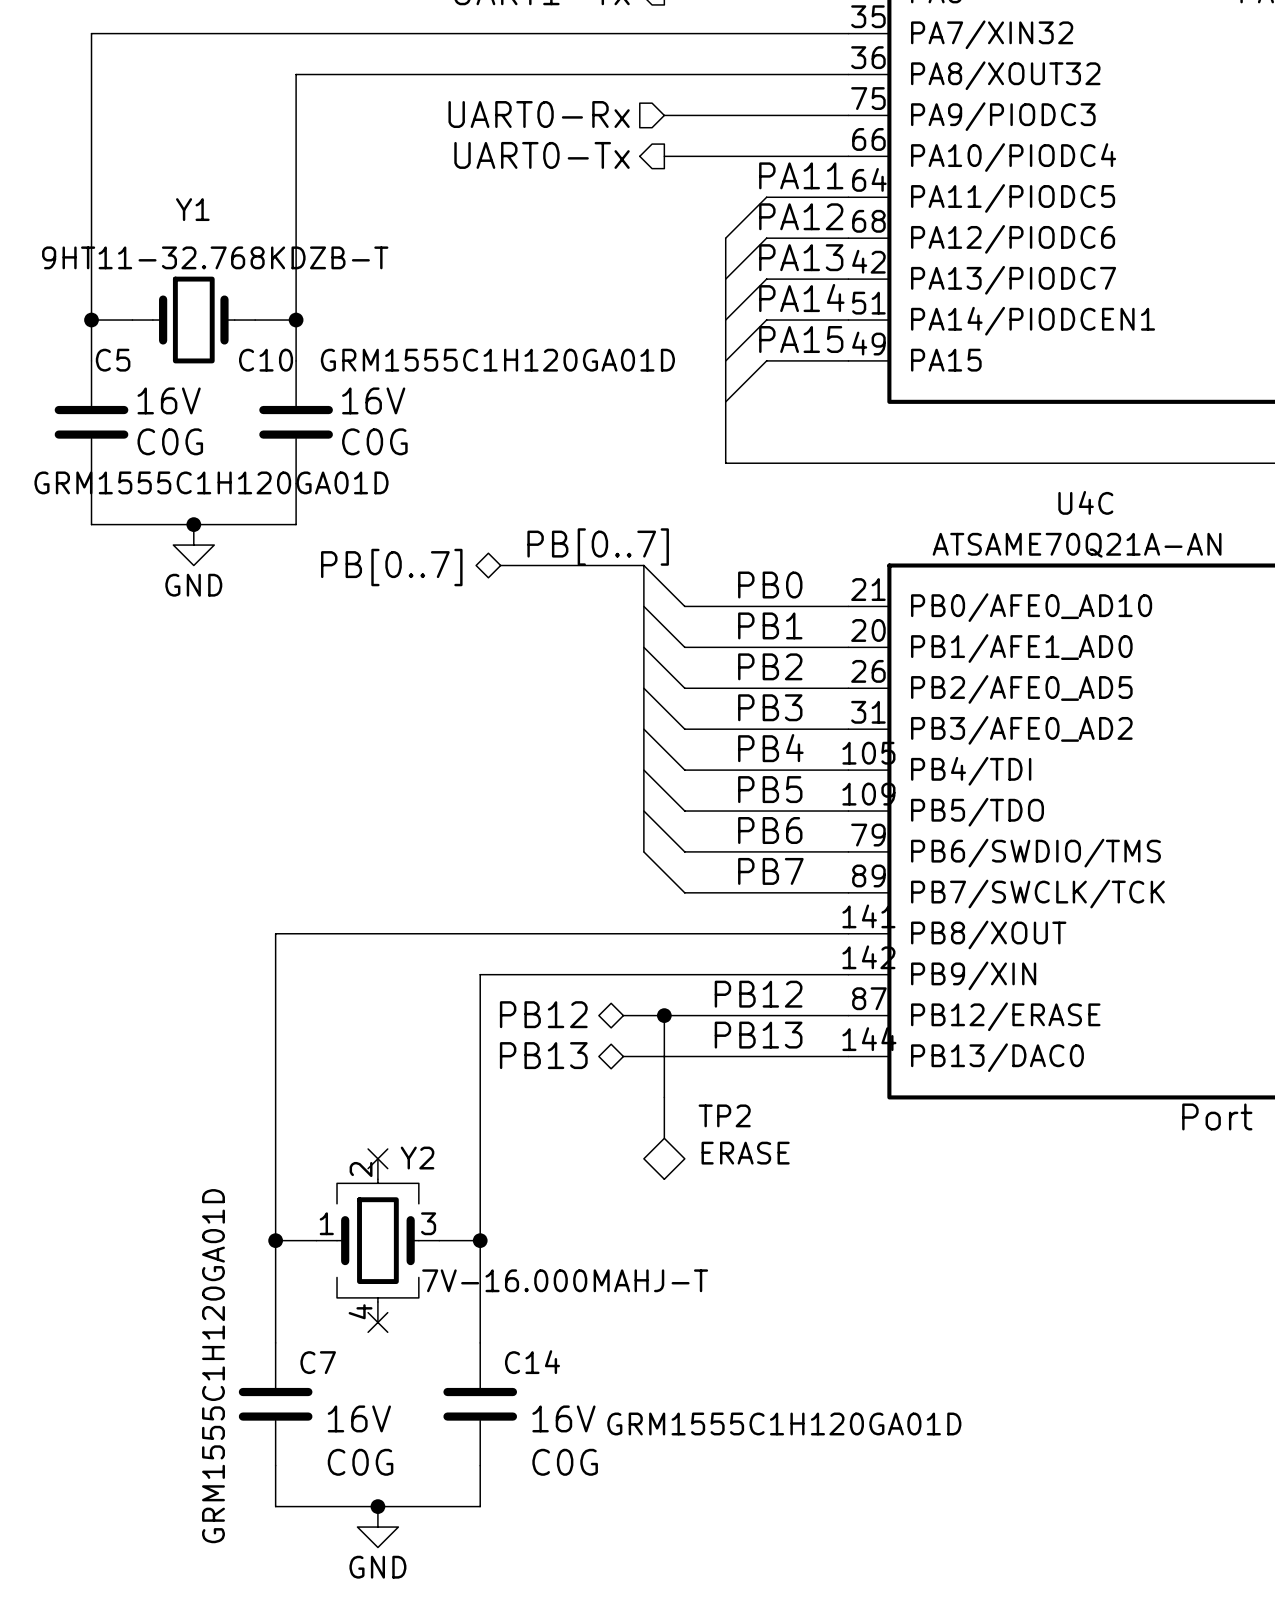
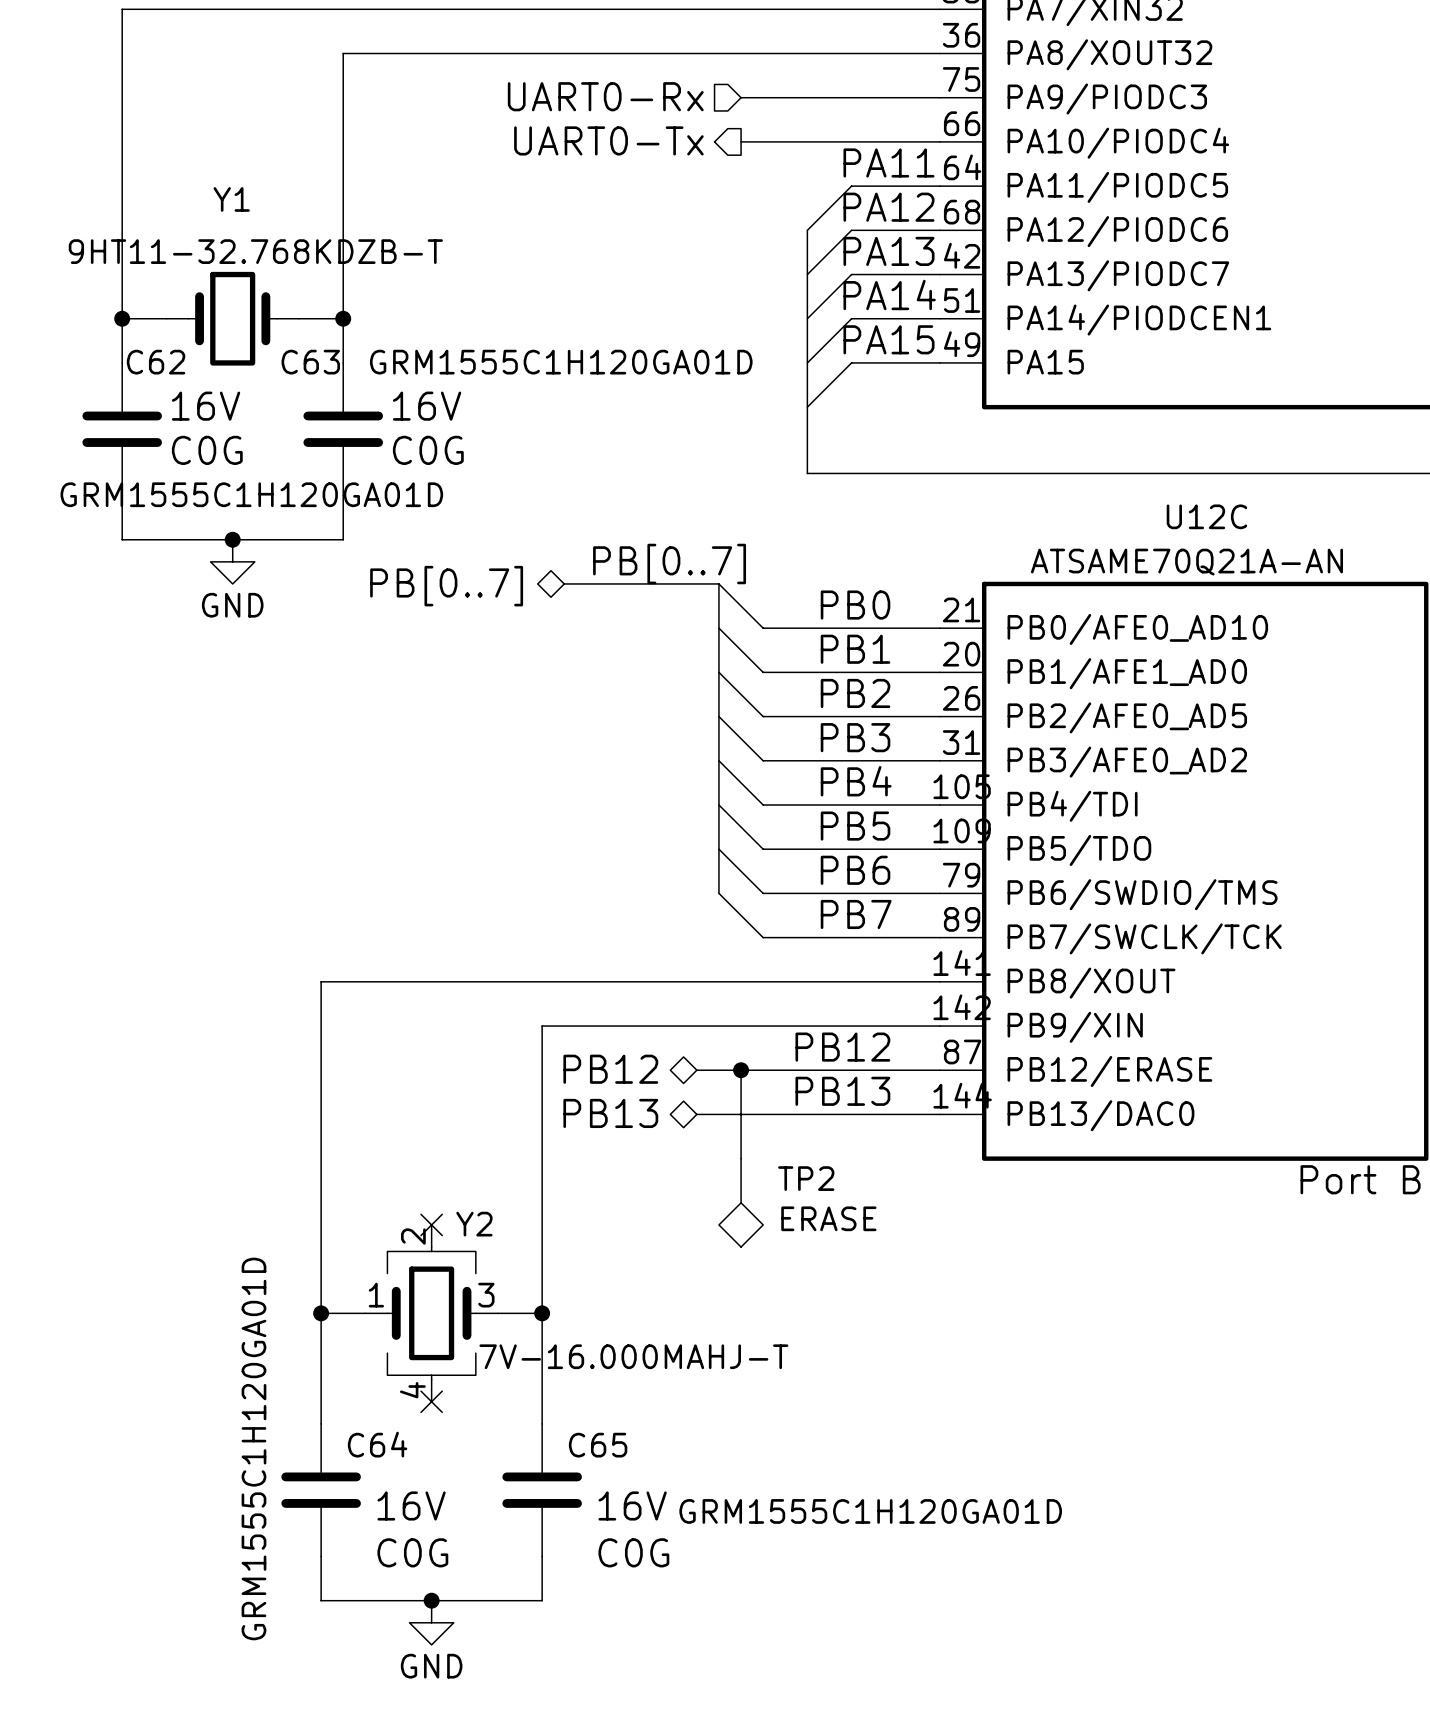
C5 name: C5 (113, 360) -> C62 (156, 362)
C10 name: C10 (266, 360) -> C63 (310, 362)
U4C name: U4C (1085, 502) -> U12C (1206, 516)
C7 name: C7 (318, 1362) -> C64 (377, 1444)
C14 name: C14 (532, 1362) -> C65 (598, 1445)

